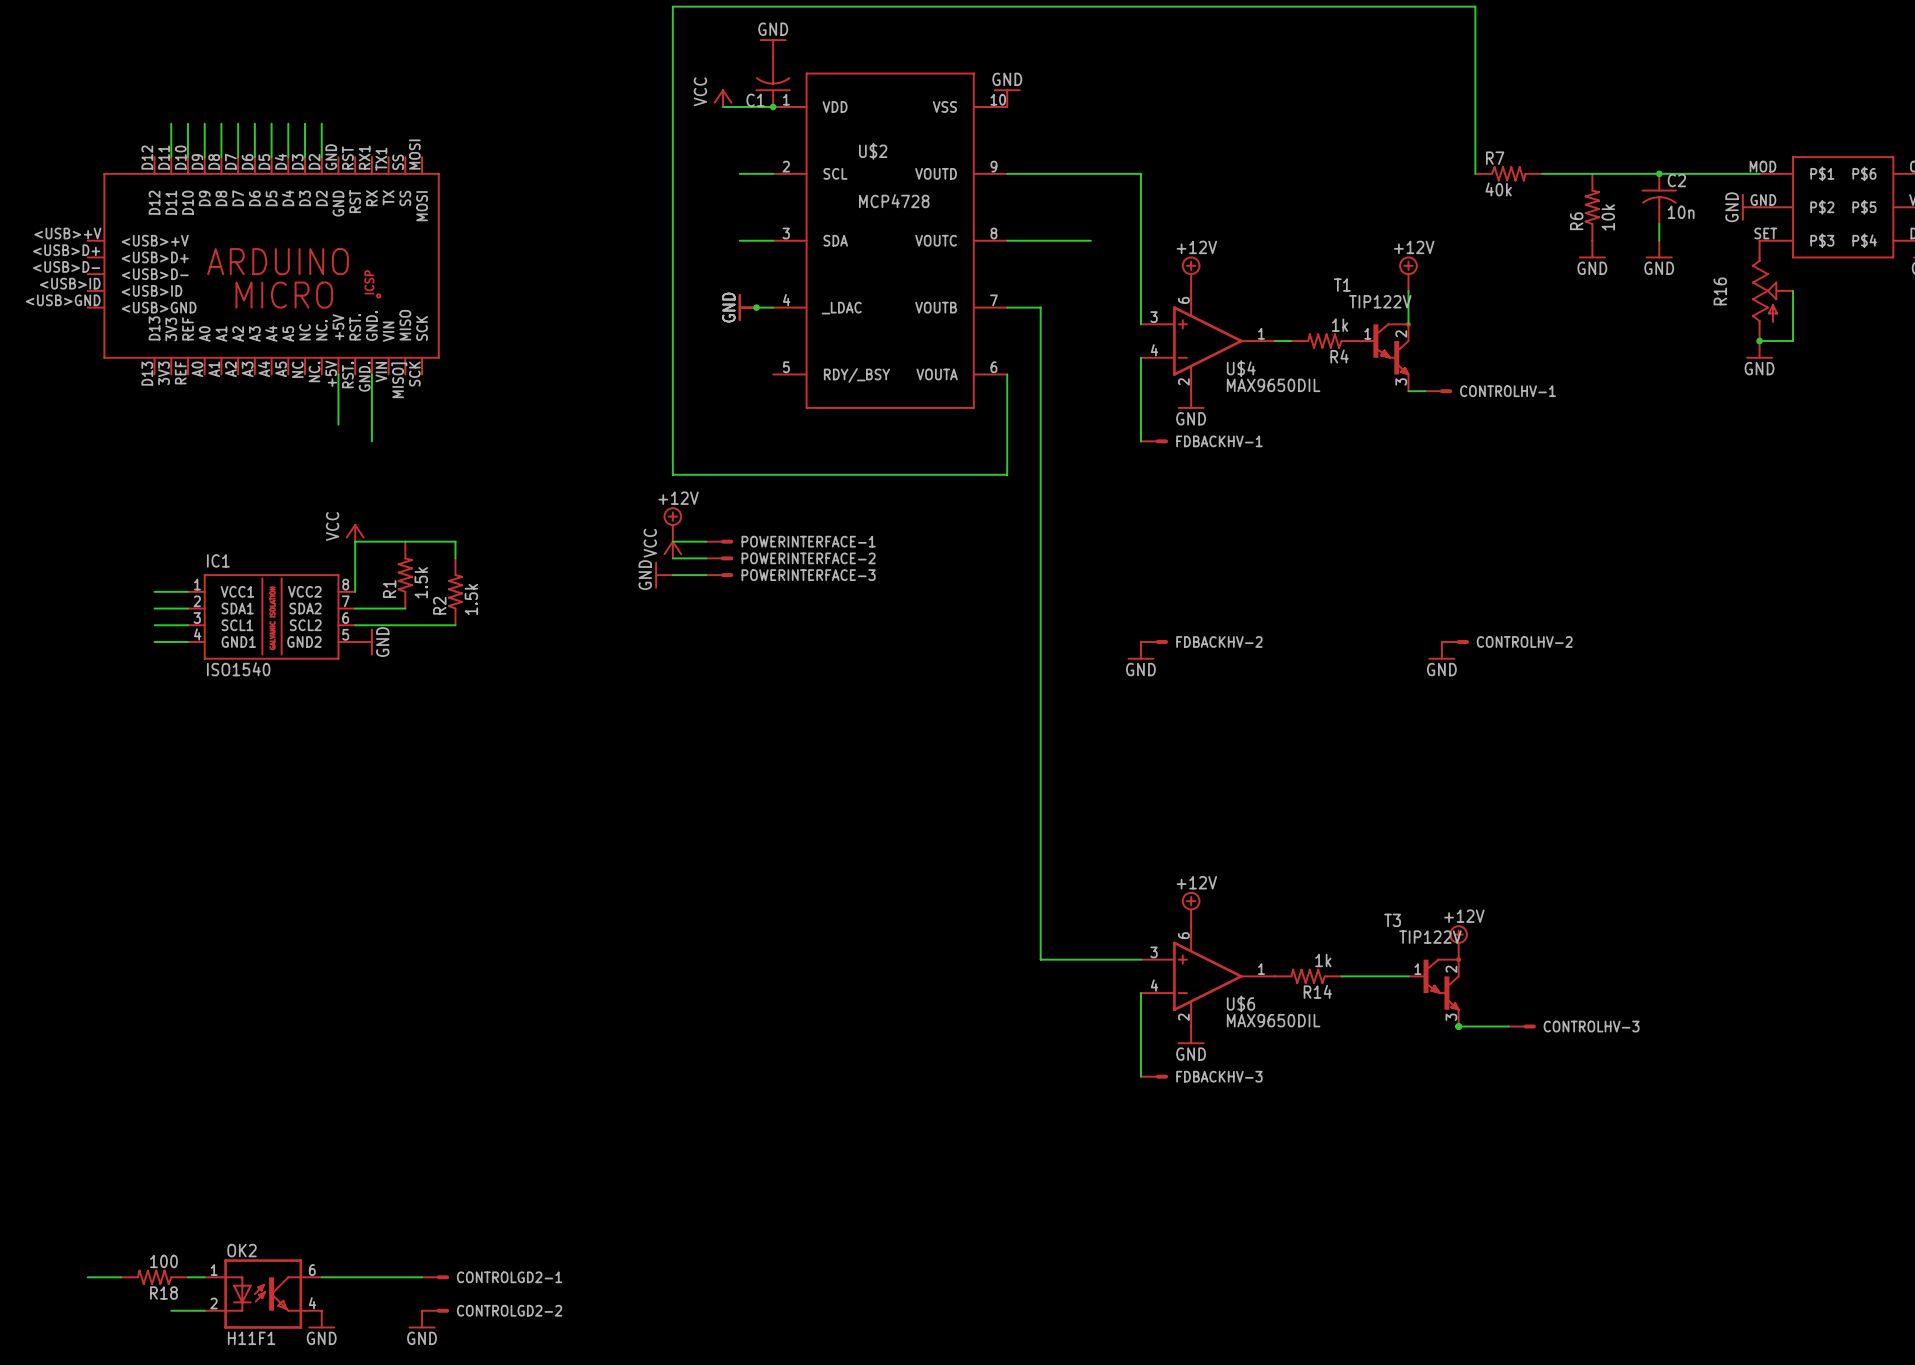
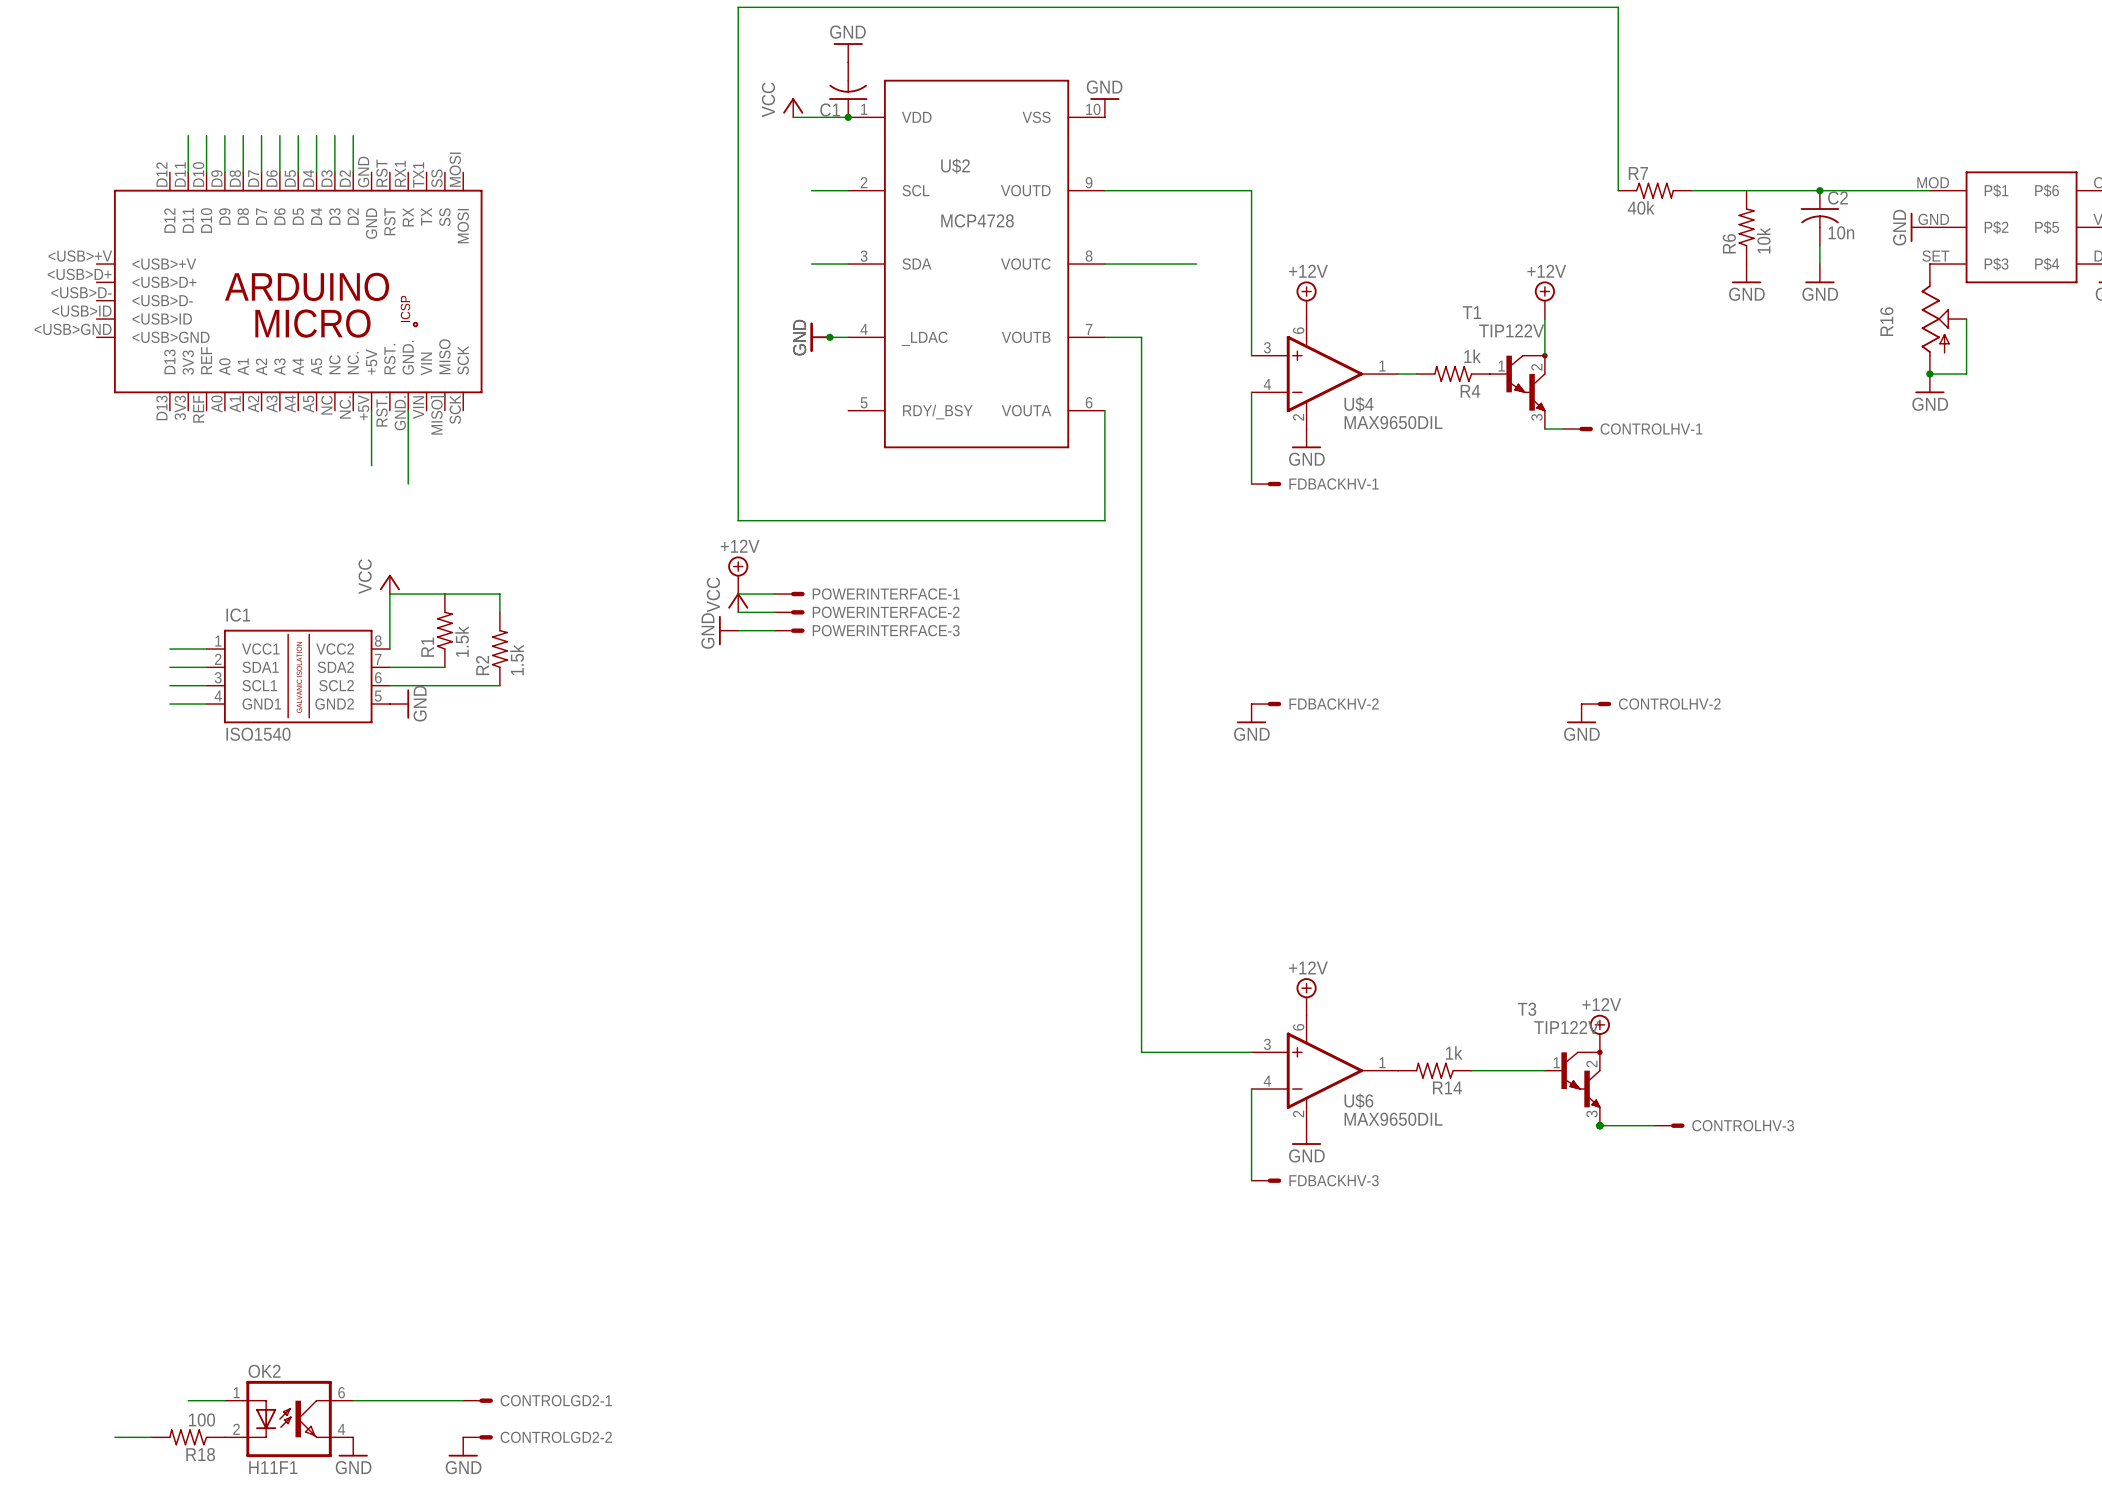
wire: (87, 1277) (121, 1277) -> (114, 1437) (151, 1437)
R18 position: (154, 1277) -> (188, 1437)

